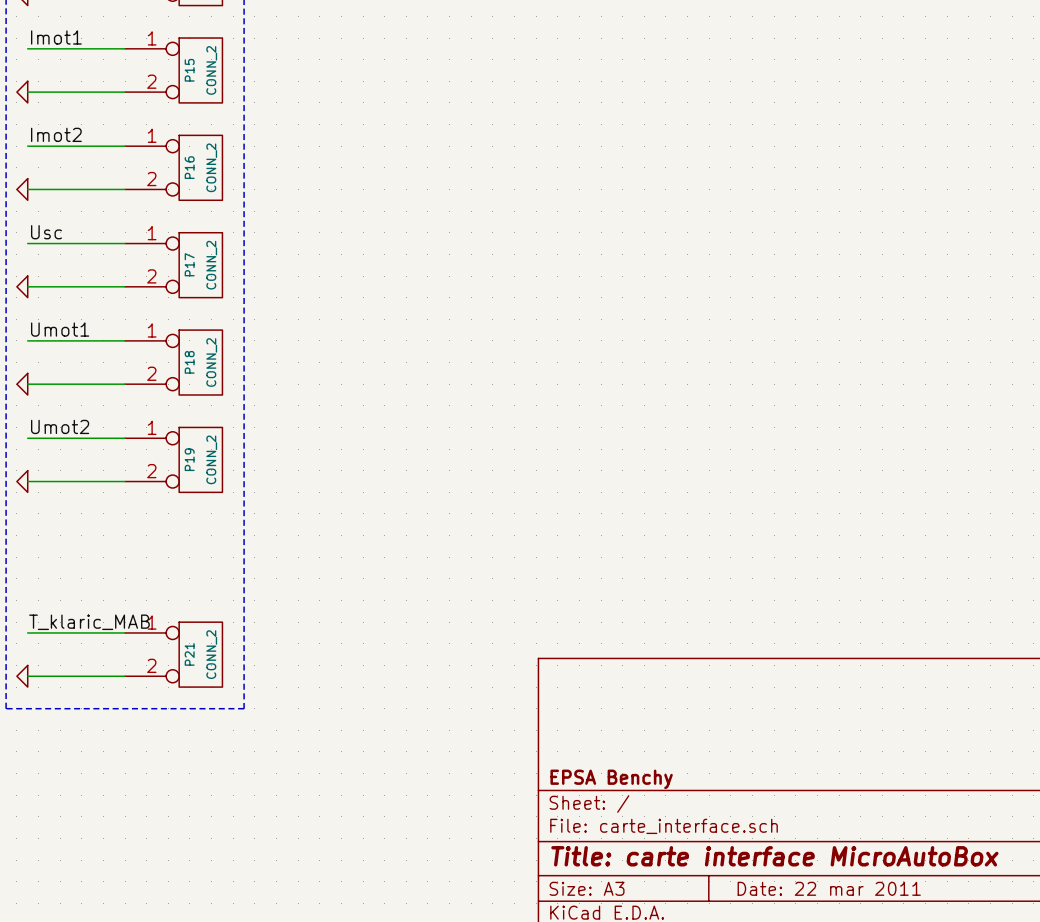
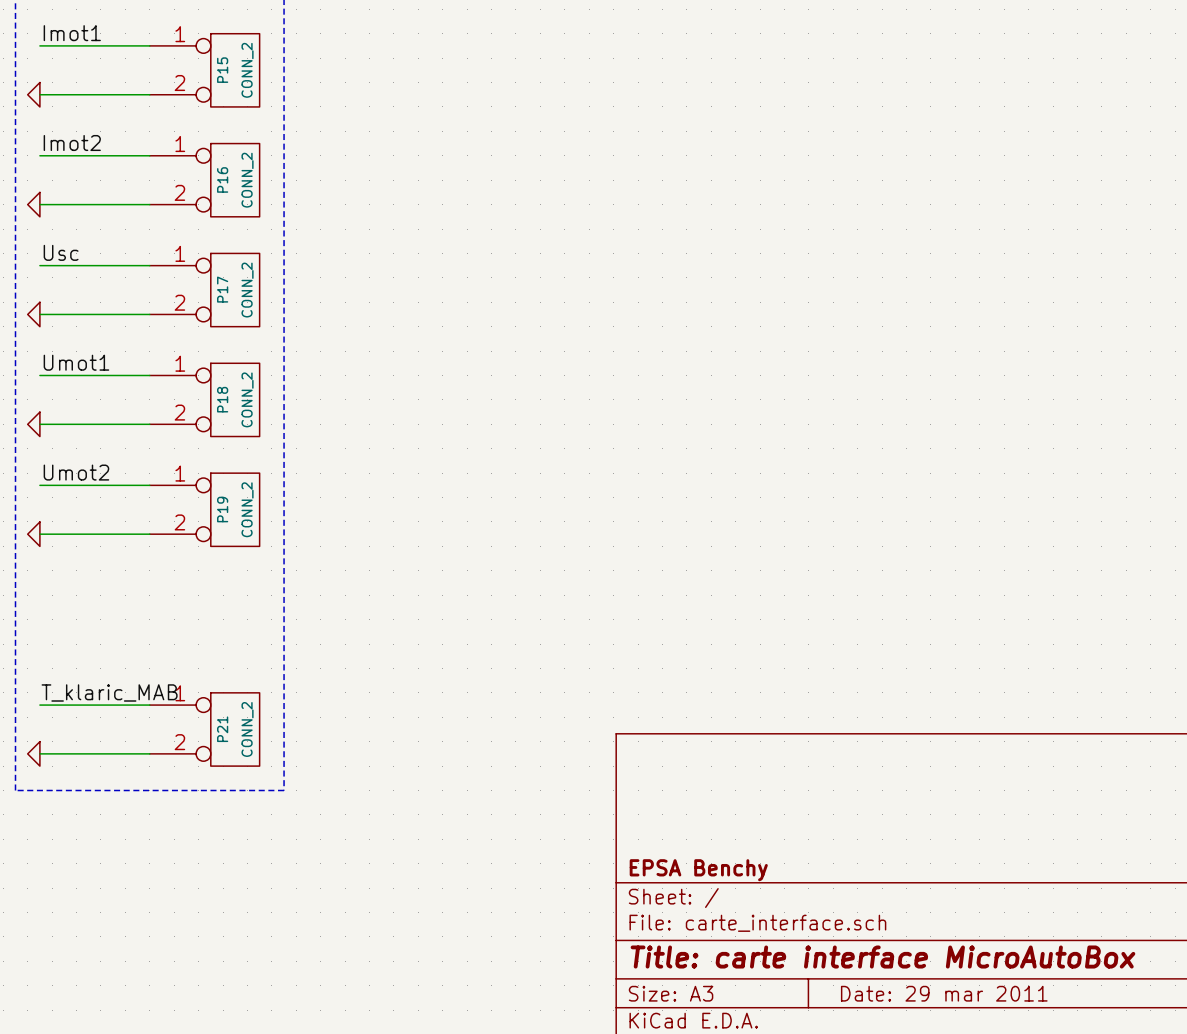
title block: Date: 22 mar 2011 (829, 888) -> Date: 29 mar 2011 (944, 993)

